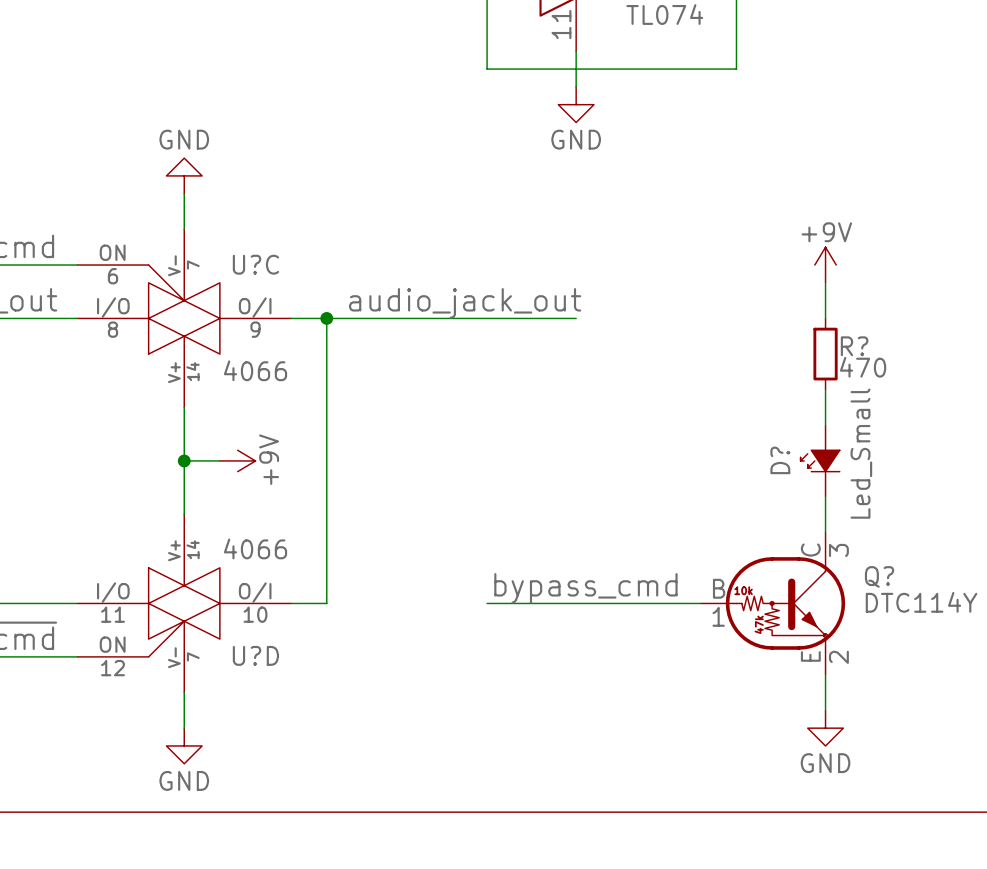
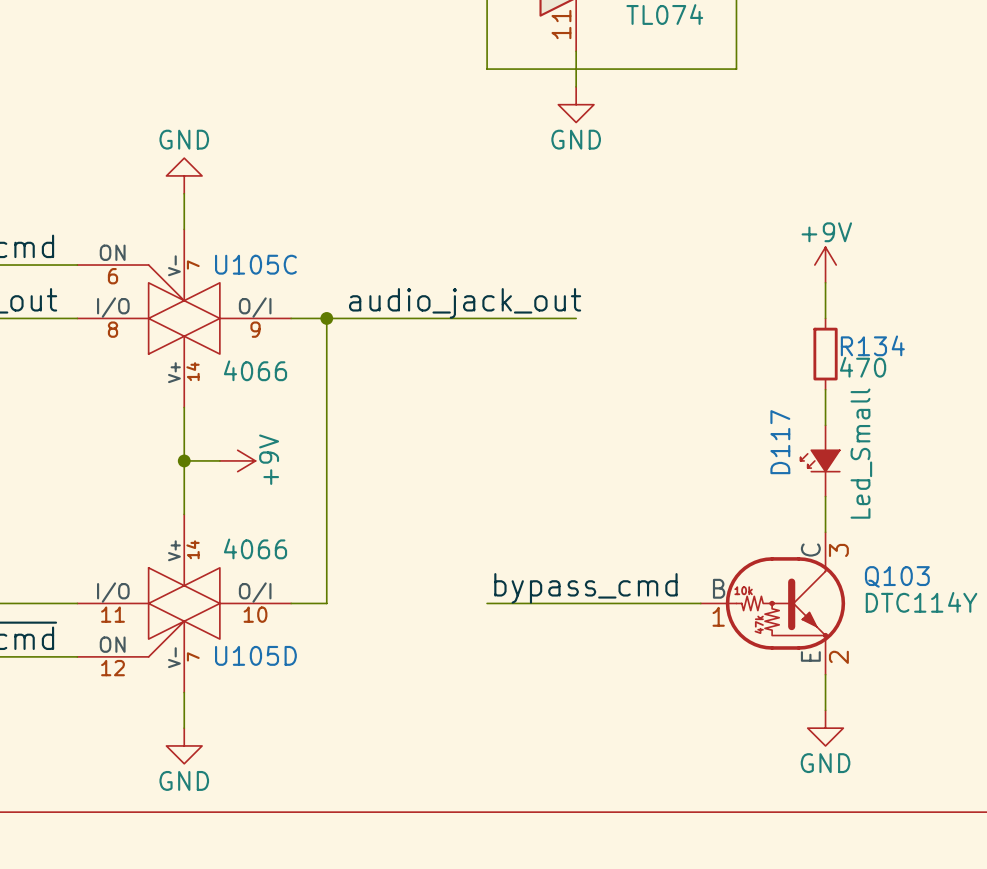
U?C name: U?C (255, 264) -> U105C (255, 264)
R? name: R? (854, 346) -> R134 (872, 345)
D? name: D? (780, 460) -> D117 (780, 442)
Q? name: Q? (879, 576) -> Q103 (897, 576)
U?D name: U?D (255, 655) -> U105D (255, 655)

